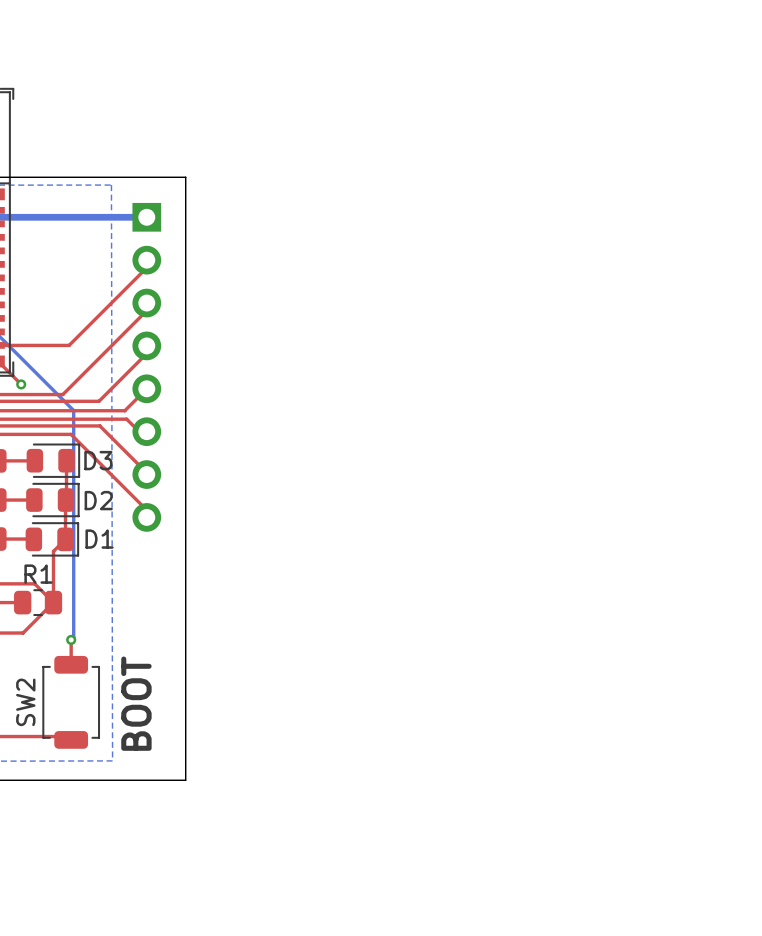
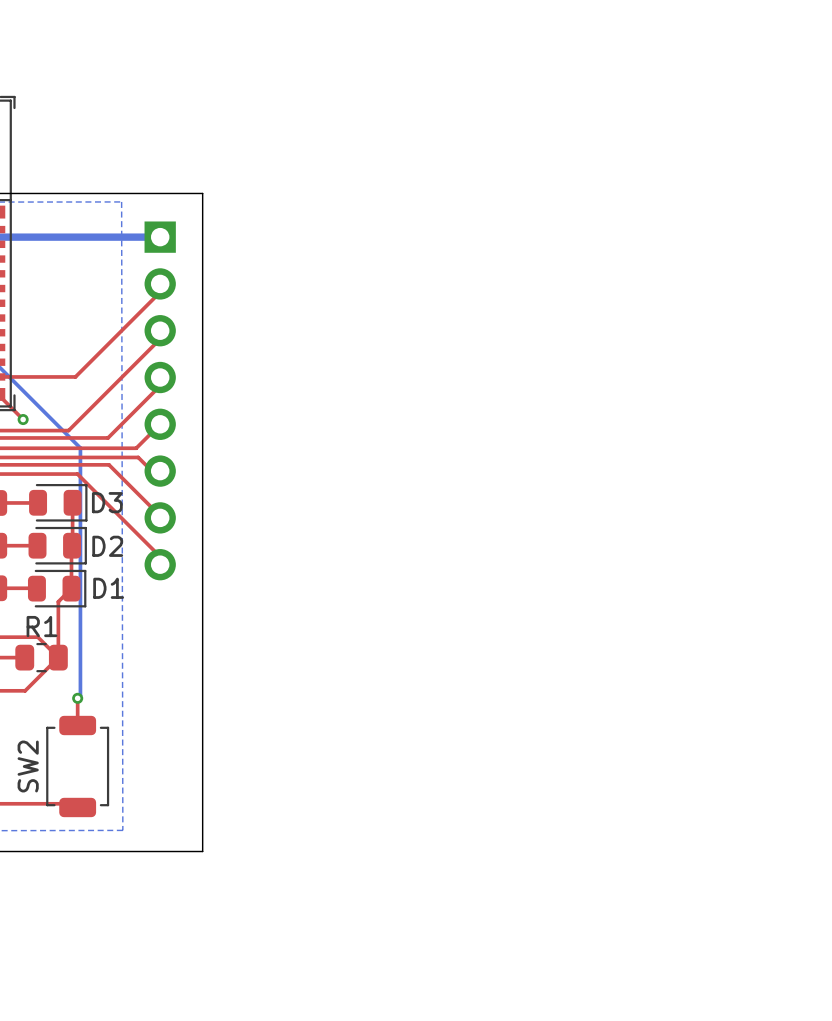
text: BOOT (136, 703) -> none

